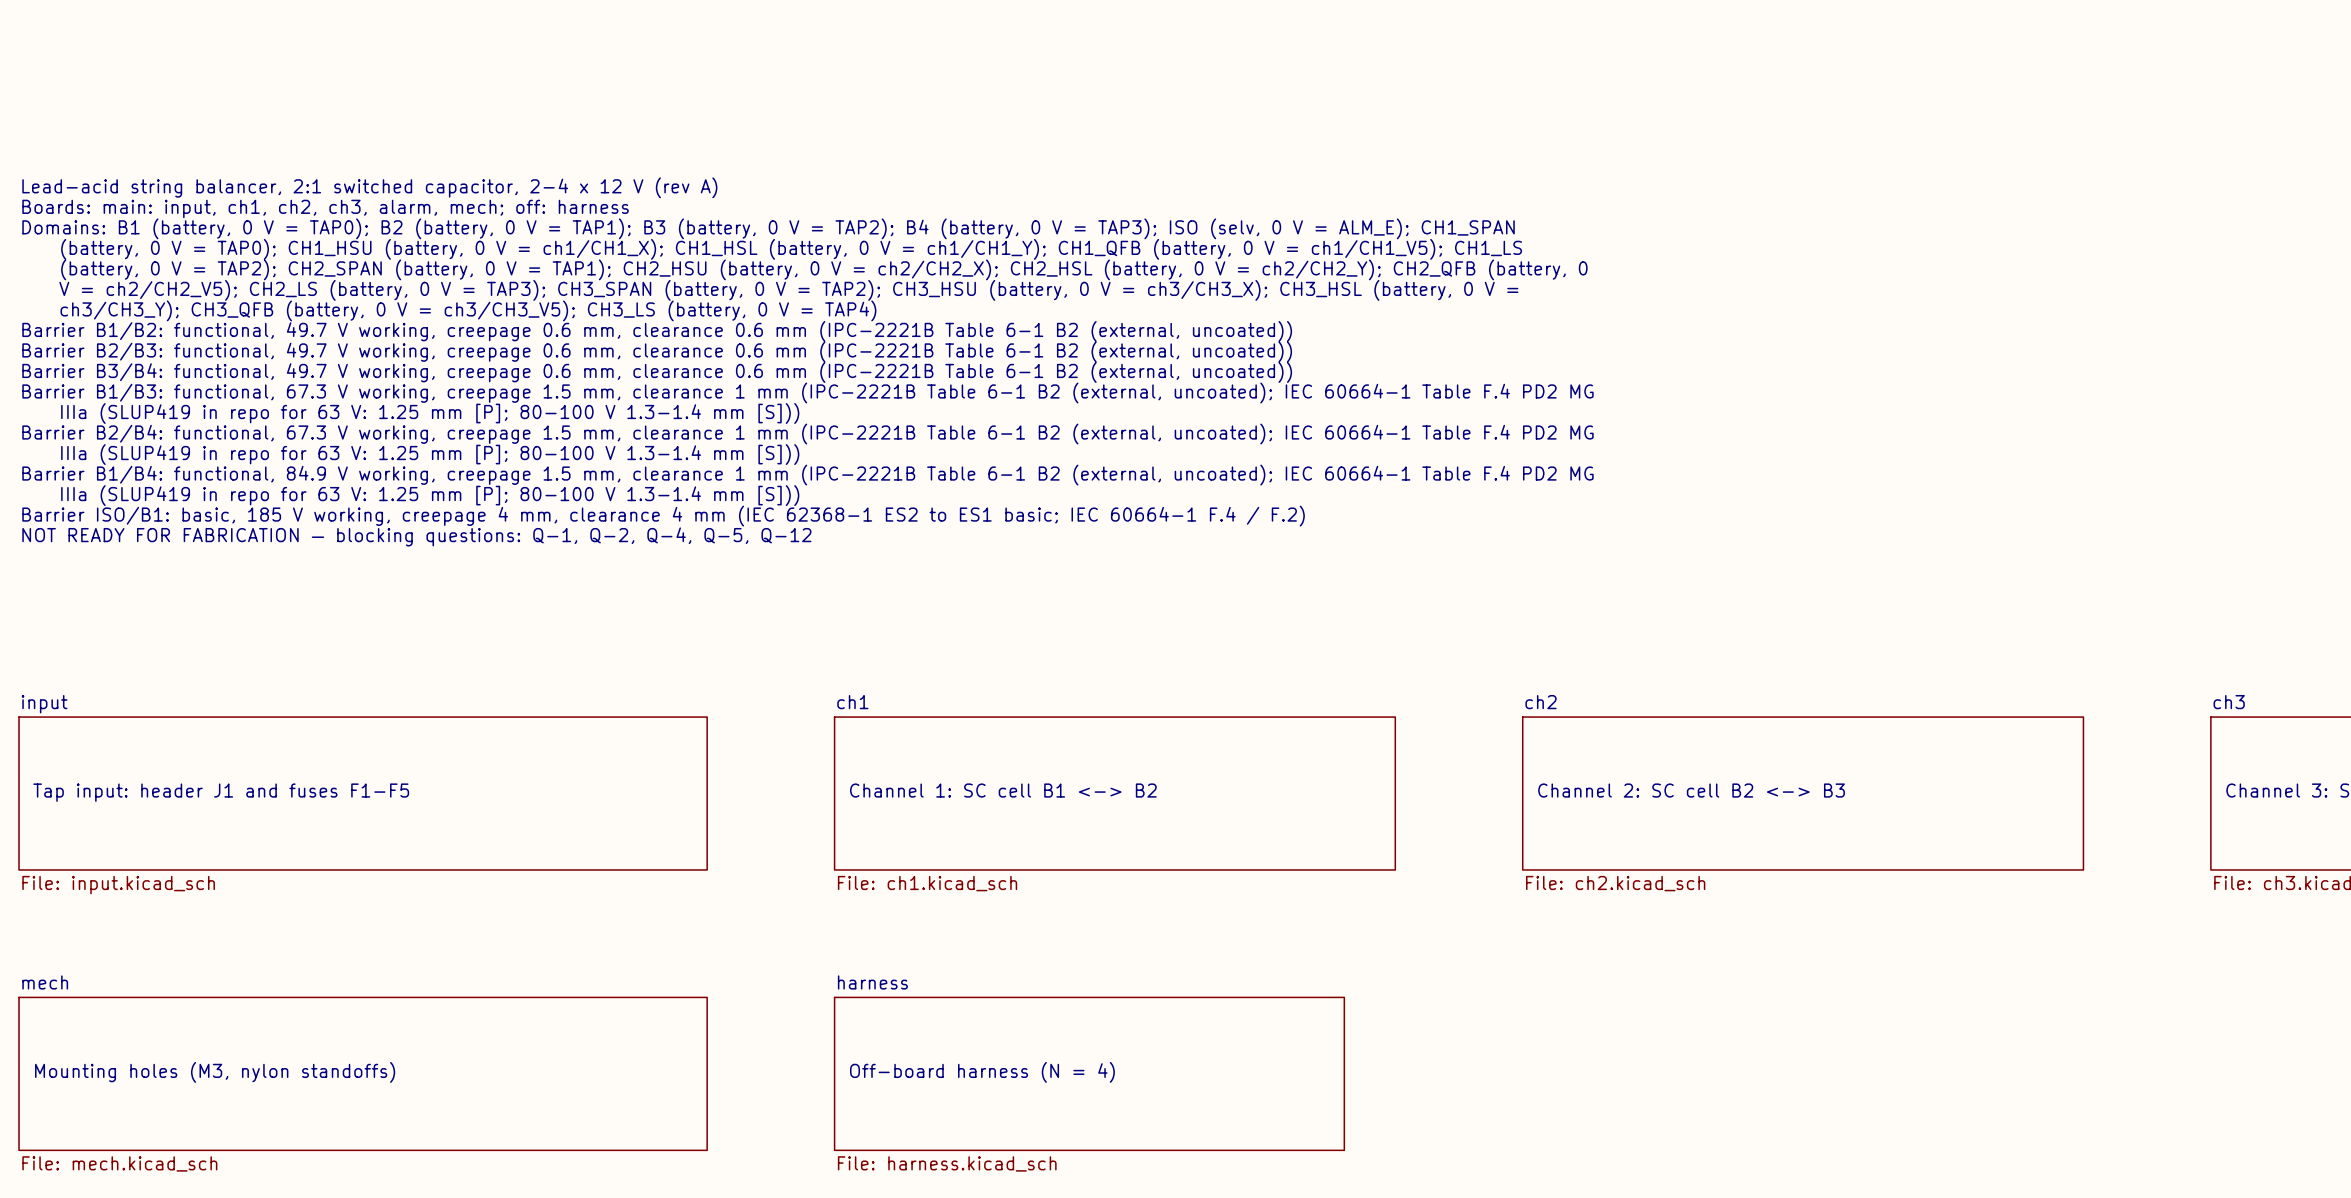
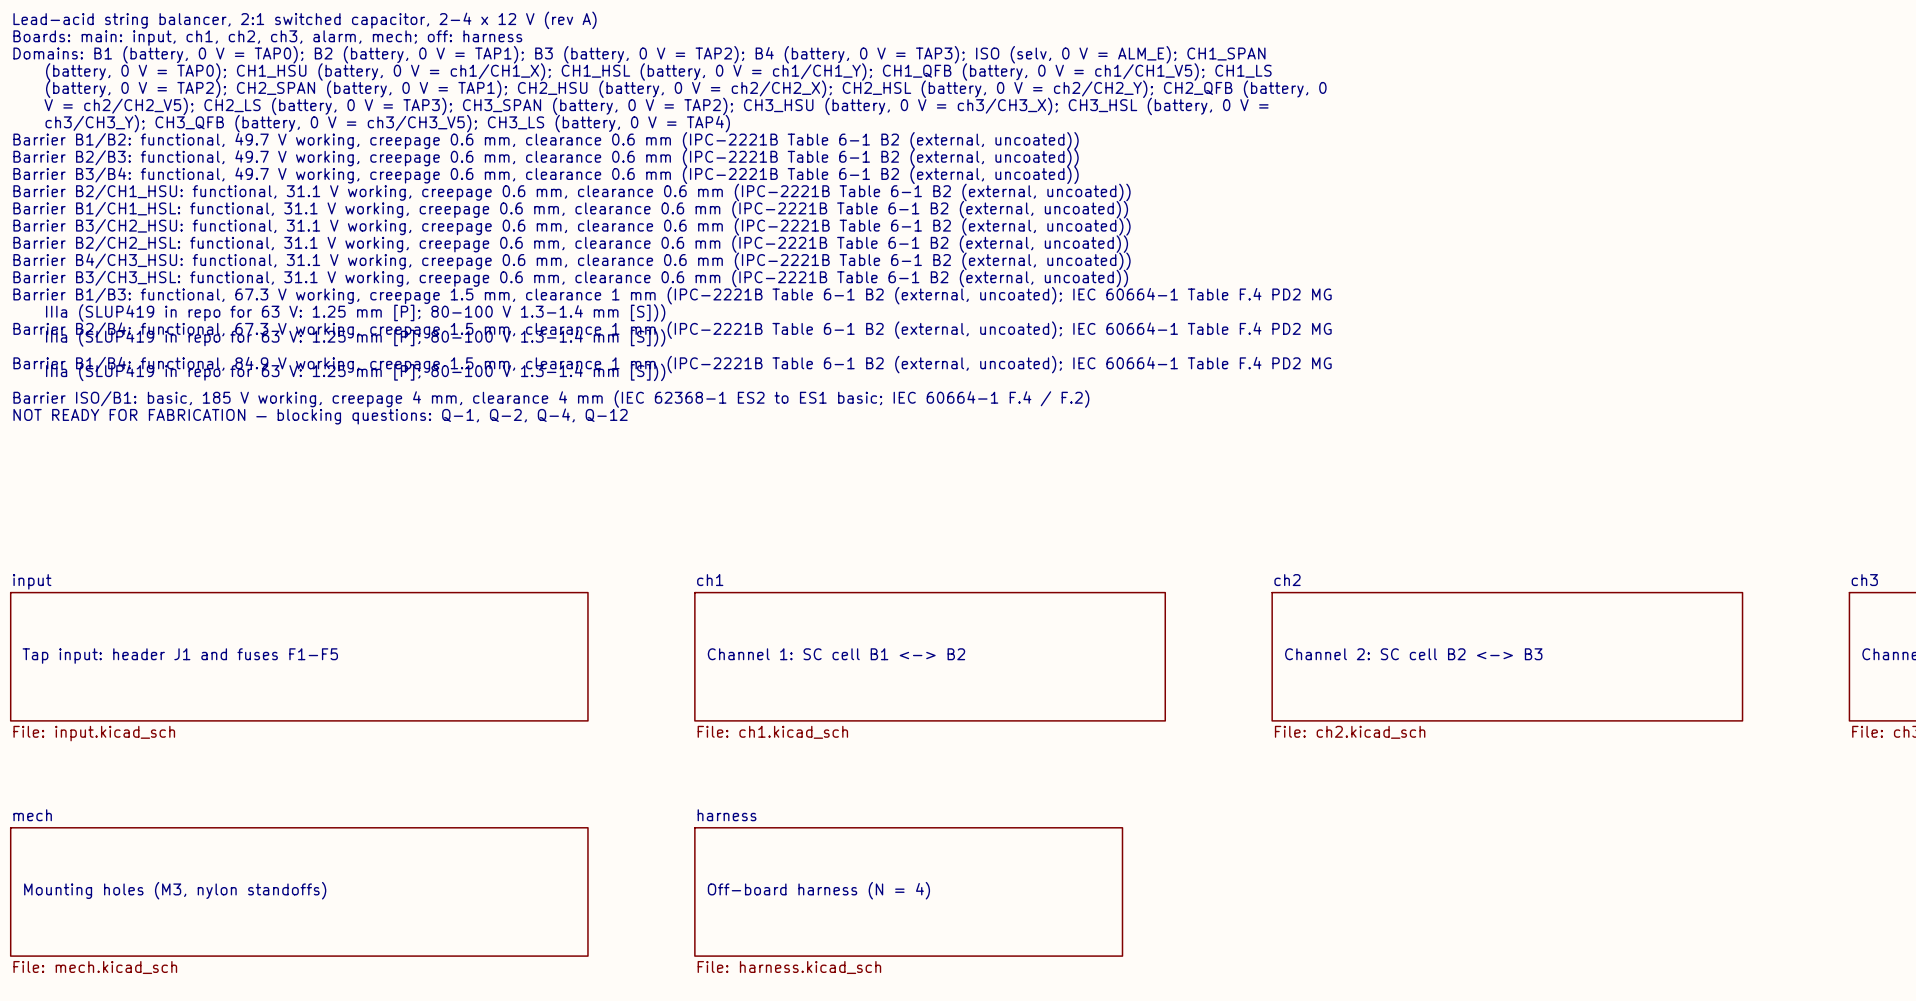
text position: Lead-acid string balancer, 2:1 switched capacitor, 2-4 x 12 V (rev A) (369, 187) -> Lead-acid string balancer, 2:1 switched capacitor, 2-4 x 12 V (rev A) (305, 20)
text position: Boards: main: input, ch1, ch2, ch3, alarm, mech; off: harness (325, 208) -> Boards: main: input, ch1, ch2, ch3, alarm, mech; off: harness (267, 38)
text position: Domains: B1 (battery, 0 V = TAP0); B2 (battery, 0 V = TAP1); B3 (battery, 0 V = TAP2); B4 (battery, 0 V = TAP3); ISO (selv, 0 V = ALM_E); CH1_SPAN (768, 228) -> Domains: B1 (battery, 0 V = TAP0); B2 (battery, 0 V = TAP1); B3 (battery, 0 V = TAP2); B4 (battery, 0 V = TAP3); ISO (selv, 0 V = ALM_E); CH1_SPAN (639, 54)
text: none -> Barrier B2/CH1_HSU: functional, 31.1 V working, creepage 0.6 mm, clearance 0.6 mm (IPC-2221B Table 6-1 B2 (external, uncoated)) (572, 192)
text position: (battery, 0 V = TAP0); CH1_HSU (battery, 0 V = ch1/CH1_X); CH1_HSL (battery, 0 V = ch1/CH1_Y); CH1_QFB (battery, 0 V = ch1/CH1_V5); CH1_LS (791, 249) -> (battery, 0 V = TAP0); CH1_HSU (battery, 0 V = ch1/CH1_X); CH1_HSL (battery, 0 V = ch1/CH1_Y); CH1_QFB (battery, 0 V = ch1/CH1_V5); CH1_LS (658, 71)
text: none -> Barrier B1/CH1_HSL: functional, 31.1 V working, creepage 0.6 mm, clearance 0.6 mm (IPC-2221B Table 6-1 B2 (external, uncoated)) (570, 209)
text position: (battery, 0 V = TAP2); CH2_SPAN (battery, 0 V = TAP1); CH2_HSU (battery, 0 V = ch2/CH2_X); CH2_HSL (battery, 0 V = ch2/CH2_Y); CH2_QFB (battery, 0 (824, 269) -> (battery, 0 V = TAP2); CH2_SPAN (battery, 0 V = TAP1); CH2_HSU (battery, 0 V = ch2/CH2_X); CH2_HSL (battery, 0 V = ch2/CH2_Y); CH2_QFB (battery, 0 (686, 89)
text: none -> Barrier B3/CH2_HSU: functional, 31.1 V working, creepage 0.6 mm, clearance 0.6 mm (IPC-2221B Table 6-1 B2 (external, uncoated)) (572, 226)
text position: V = ch2/CH2_V5); CH2_LS (battery, 0 V = TAP3); CH3_SPAN (battery, 0 V = TAP2); CH3_HSU (battery, 0 V = ch3/CH3_X); CH3_HSL (battery, 0 V = (788, 290) -> V = ch2/CH2_V5); CH2_LS (battery, 0 V = TAP3); CH3_SPAN (battery, 0 V = TAP2); CH3_HSU (battery, 0 V = ch3/CH3_X); CH3_HSL (battery, 0 V = (656, 106)
text: none -> Barrier B2/CH2_HSL: functional, 31.1 V working, creepage 0.6 mm, clearance 0.6 mm (IPC-2221B Table 6-1 B2 (external, uncoated)) (570, 244)
text position: ch3/CH3_Y); CH3_QFB (battery, 0 V = ch3/CH3_V5); CH3_LS (battery, 0 V = TAP4) (468, 310) -> ch3/CH3_Y); CH3_QFB (battery, 0 V = ch3/CH3_V5); CH3_LS (battery, 0 V = TAP4) (387, 123)
text: none -> Barrier B4/CH3_HSU: functional, 31.1 V working, creepage 0.6 mm, clearance 0.6 mm (IPC-2221B Table 6-1 B2 (external, uncoated)) (572, 261)
text position: Barrier B1/B2: functional, 49.7 V working, creepage 0.6 mm, clearance 0.6 mm (IPC-2221B Table 6-1 B2 (external, uncoated)) (657, 331) -> Barrier B1/B2: functional, 49.7 V working, creepage 0.6 mm, clearance 0.6 mm (IPC-2221B Table 6-1 B2 (external, uncoated)) (546, 140)
text: none -> Barrier B3/CH3_HSL: functional, 31.1 V working, creepage 0.6 mm, clearance 0.6 mm (IPC-2221B Table 6-1 B2 (external, uncoated)) (570, 278)
text position: Barrier B2/B3: functional, 49.7 V working, creepage 0.6 mm, clearance 0.6 mm (IPC-2221B Table 6-1 B2 (external, uncoated)) (657, 351) -> Barrier B2/B3: functional, 49.7 V working, creepage 0.6 mm, clearance 0.6 mm (IPC-2221B Table 6-1 B2 (external, uncoated)) (546, 158)
text position: Barrier B3/B4: functional, 49.7 V working, creepage 0.6 mm, clearance 0.6 mm (IPC-2221B Table 6-1 B2 (external, uncoated)) (657, 372) -> Barrier B3/B4: functional, 49.7 V working, creepage 0.6 mm, clearance 0.6 mm (IPC-2221B Table 6-1 B2 (external, uncoated)) (546, 175)
text position: Barrier B1/B3: functional, 67.3 V working, creepage 1.5 mm, clearance 1 mm (IPC-2221B Table 6-1 B2 (external, uncoated); IEC 60664-1 Table F.4 PD2 MG (807, 392) -> Barrier B1/B3: functional, 67.3 V working, creepage 1.5 mm, clearance 1 mm (IPC-2221B Table 6-1 B2 (external, uncoated); IEC 60664-1 Table F.4 PD2 MG (672, 295)
text position: Barrier B2/B4: functional, 67.3 V working, creepage 1.5 mm, clearance 1 mm (IPC-2221B Table 6-1 B2 (external, uncoated); IEC 60664-1 Table F.4 PD2 MG (807, 434) -> Barrier B2/B4: functional, 67.3 V working, creepage 1.5 mm, clearance 1 mm (IPC-2221B Table 6-1 B2 (external, uncoated); IEC 60664-1 Table F.4 PD2 MG (672, 330)
text position: Barrier B1/B4: functional, 84.9 V working, creepage 1.5 mm, clearance 1 mm (IPC-2221B Table 6-1 B2 (external, uncoated); IEC 60664-1 Table F.4 PD2 MG (807, 475) -> Barrier B1/B4: functional, 84.9 V working, creepage 1.5 mm, clearance 1 mm (IPC-2221B Table 6-1 B2 (external, uncoated); IEC 60664-1 Table F.4 PD2 MG (672, 364)
text position: IIIa (SLUP419 in repo for 63 V: 1.25 mm [P]; 80-100 V 1.3-1.4 mm [S])) (430, 495) -> IIIa (SLUP419 in repo for 63 V: 1.25 mm [P]; 80-100 V 1.3-1.4 mm [S])) (355, 312)
text: none -> NOT READY FOR FABRICATION — blocking questions: Q-1, Q-2, Q-4, Q-12 (320, 416)
text position: Barrier ISO/B1: basic, 185 V working, creepage 4 mm, clearance 4 mm (IEC 62368-1 ES2 to ES1 basic; IEC 60664-1 F.4 / F.2) (663, 516) -> Barrier ISO/B1: basic, 185 V working, creepage 4 mm, clearance 4 mm (IEC 62368-1 ES2 to ES1 basic; IEC 60664-1 F.4 / F.2) (551, 399)
text: NOT READY FOR FABRICATION — blocking questions: Q-1, Q-2, Q-4, Q-5, Q-12 (416, 536) -> none

